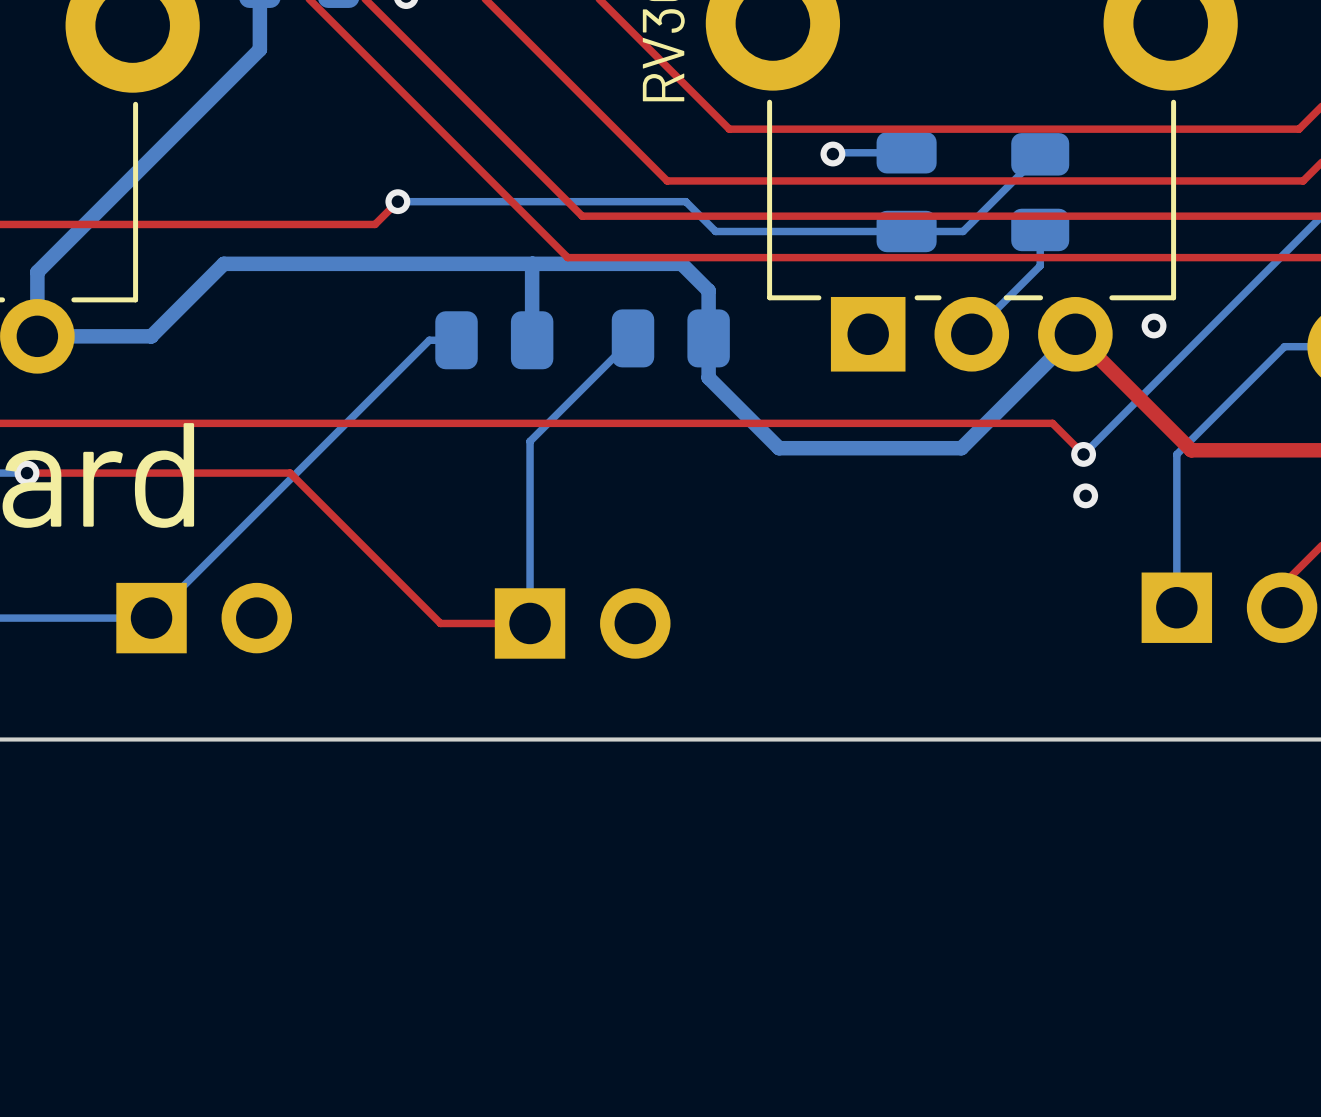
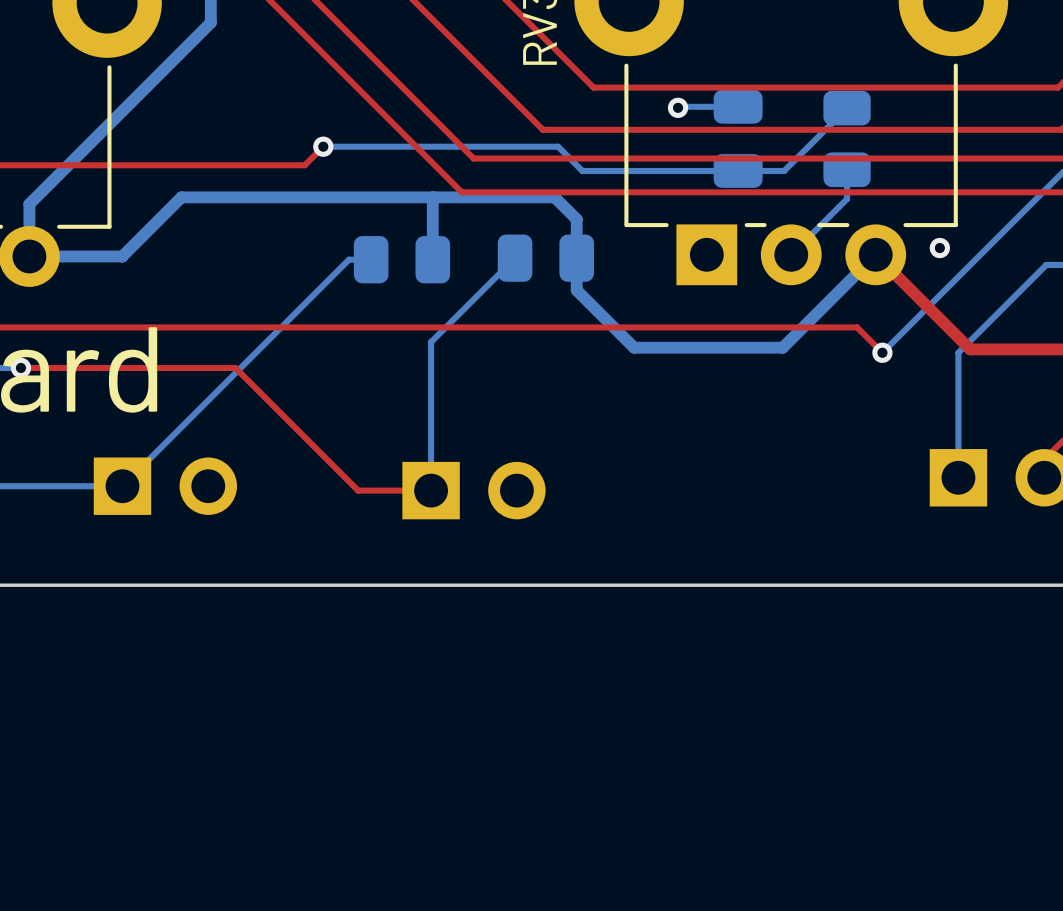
via: (1085, 495) -> none

